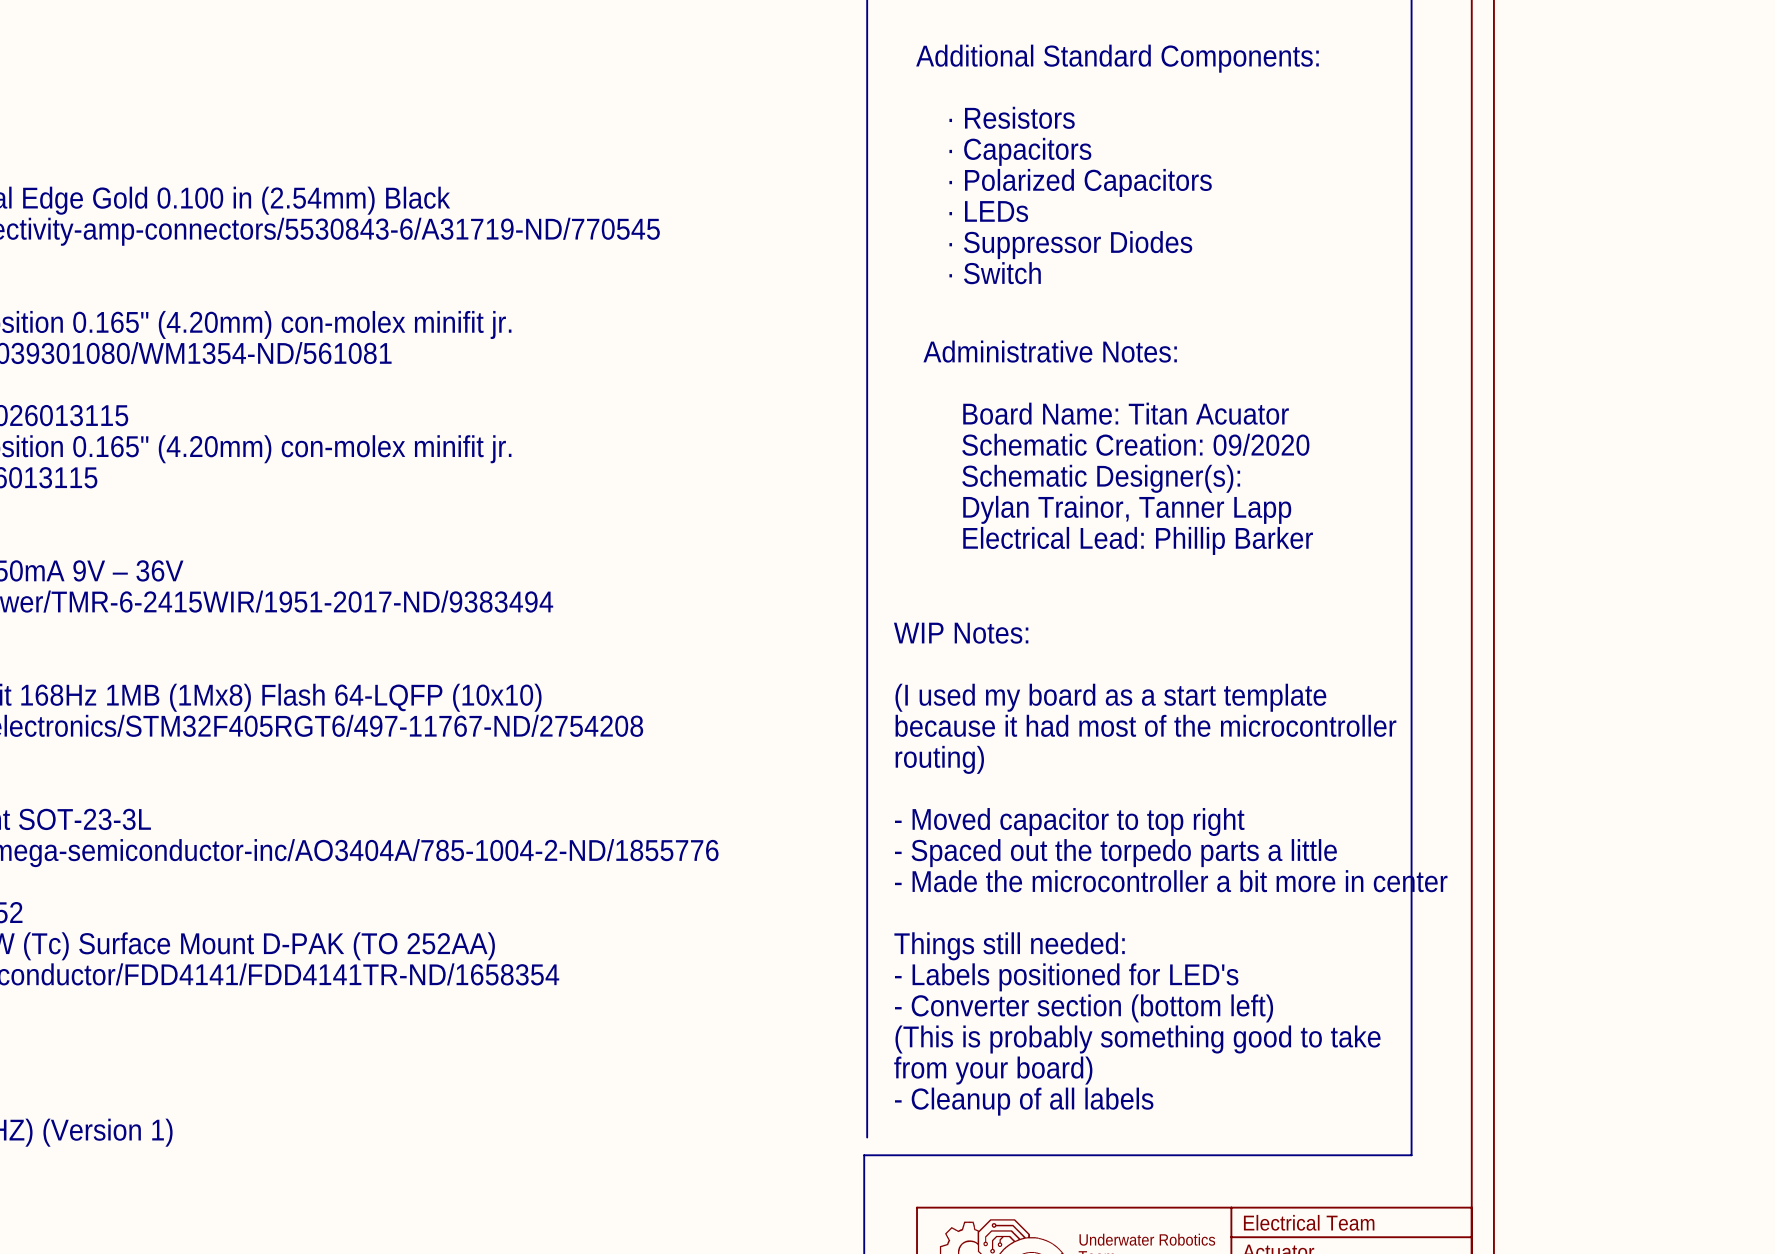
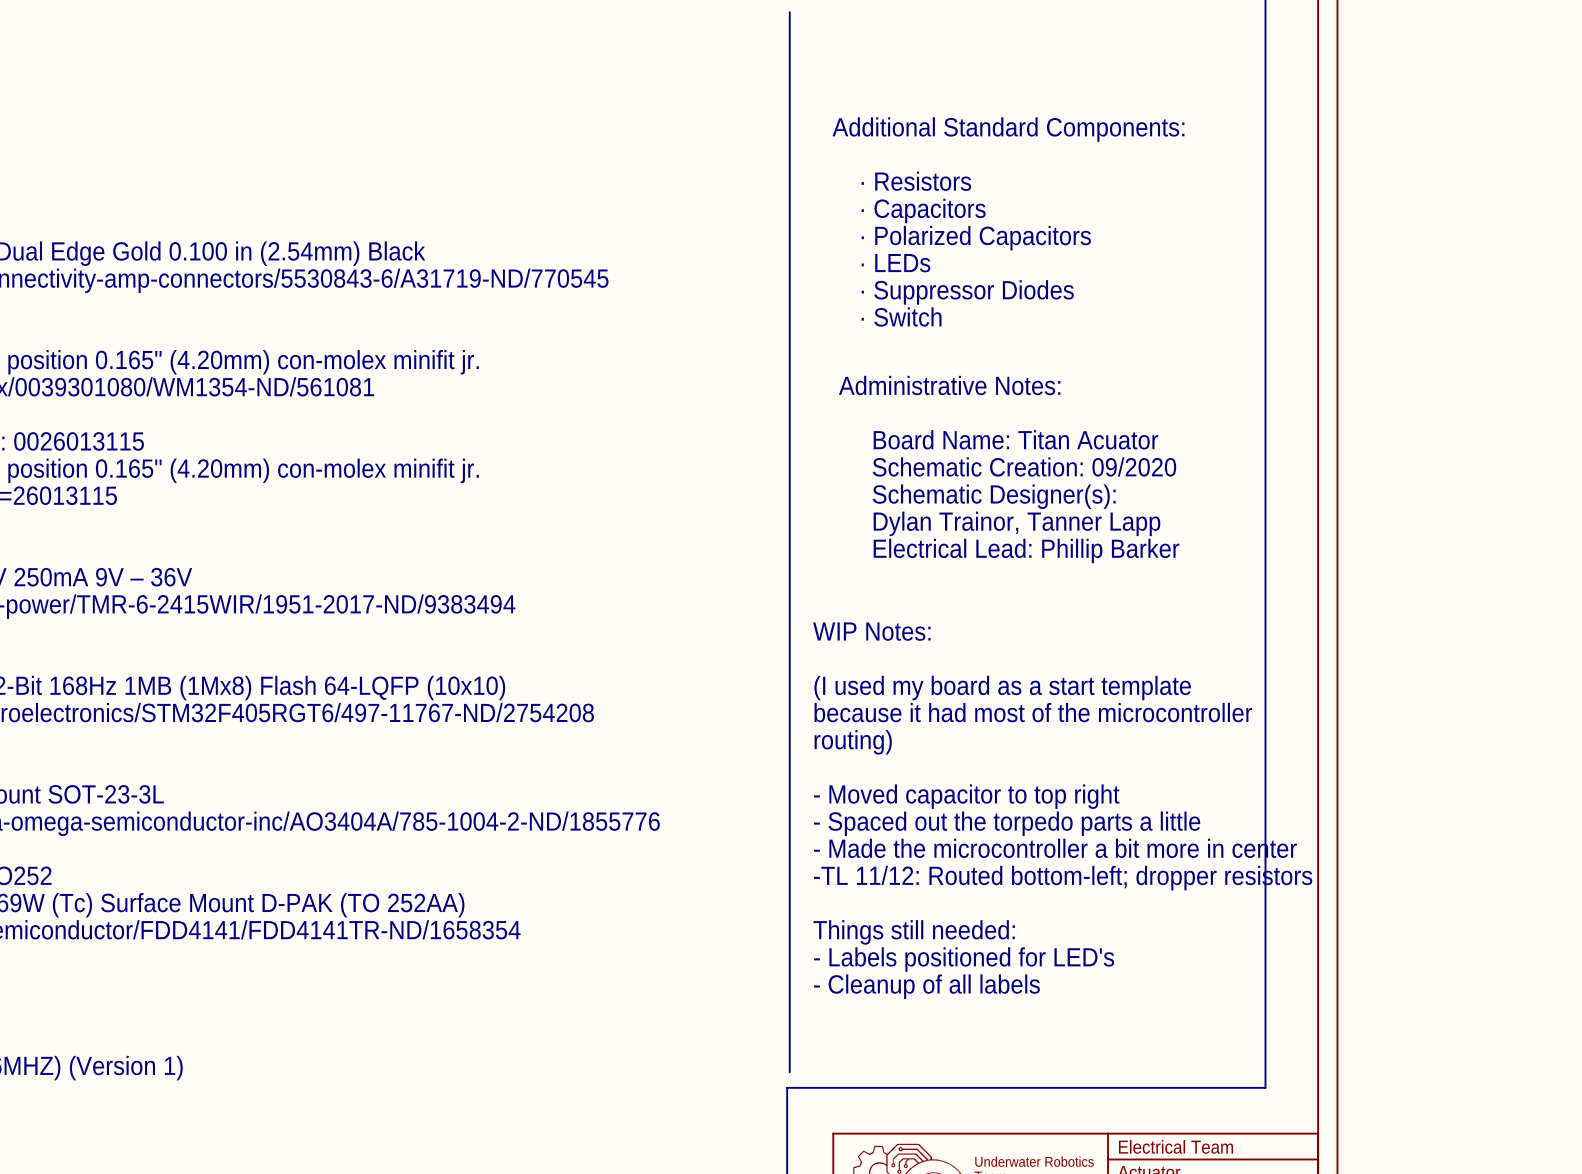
text: none -> -TL 11/12: Routed bottom-left; dropper resistors (1063, 878)
text: Things still needed: (1009, 946) -> none
text: - Labels positioned for LED's (1066, 977) -> Things still needed: (914, 932)
text: - Converter section (bottom left) (1084, 1008) -> - Labels positioned for LED's (964, 959)
text: (This is probably something good to take (1138, 1039) -> - Cleanup of all labels (926, 986)
text: from your board) (993, 1070) -> none
text: - Cleanup of all labels (1024, 1101) -> none

